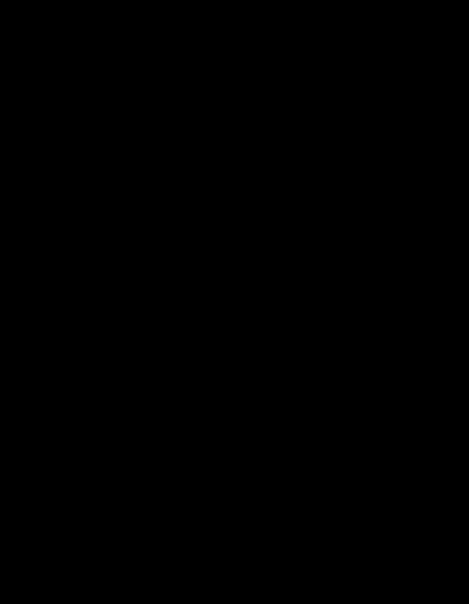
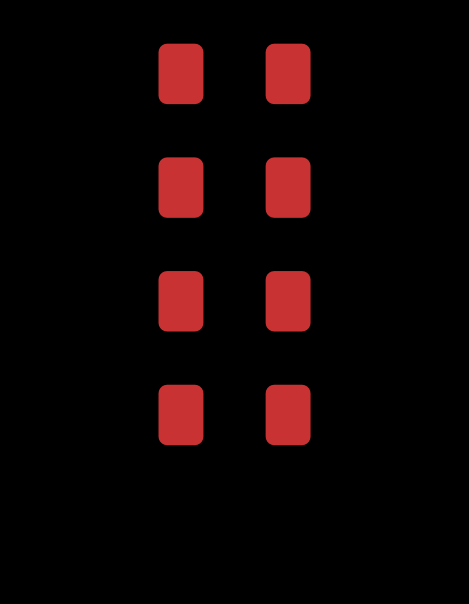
part: none -> (234, 73)
part: none -> (234, 187)
part: none -> (234, 301)
part: none -> (234, 414)

